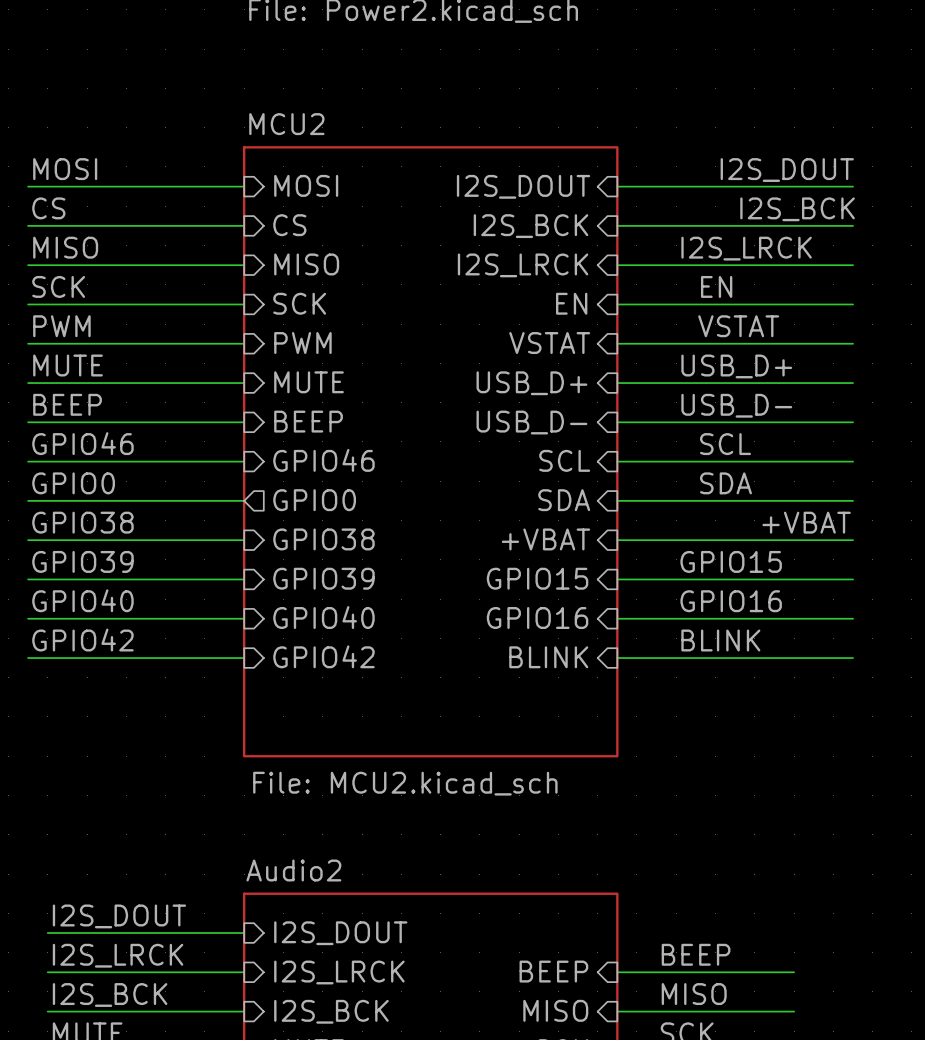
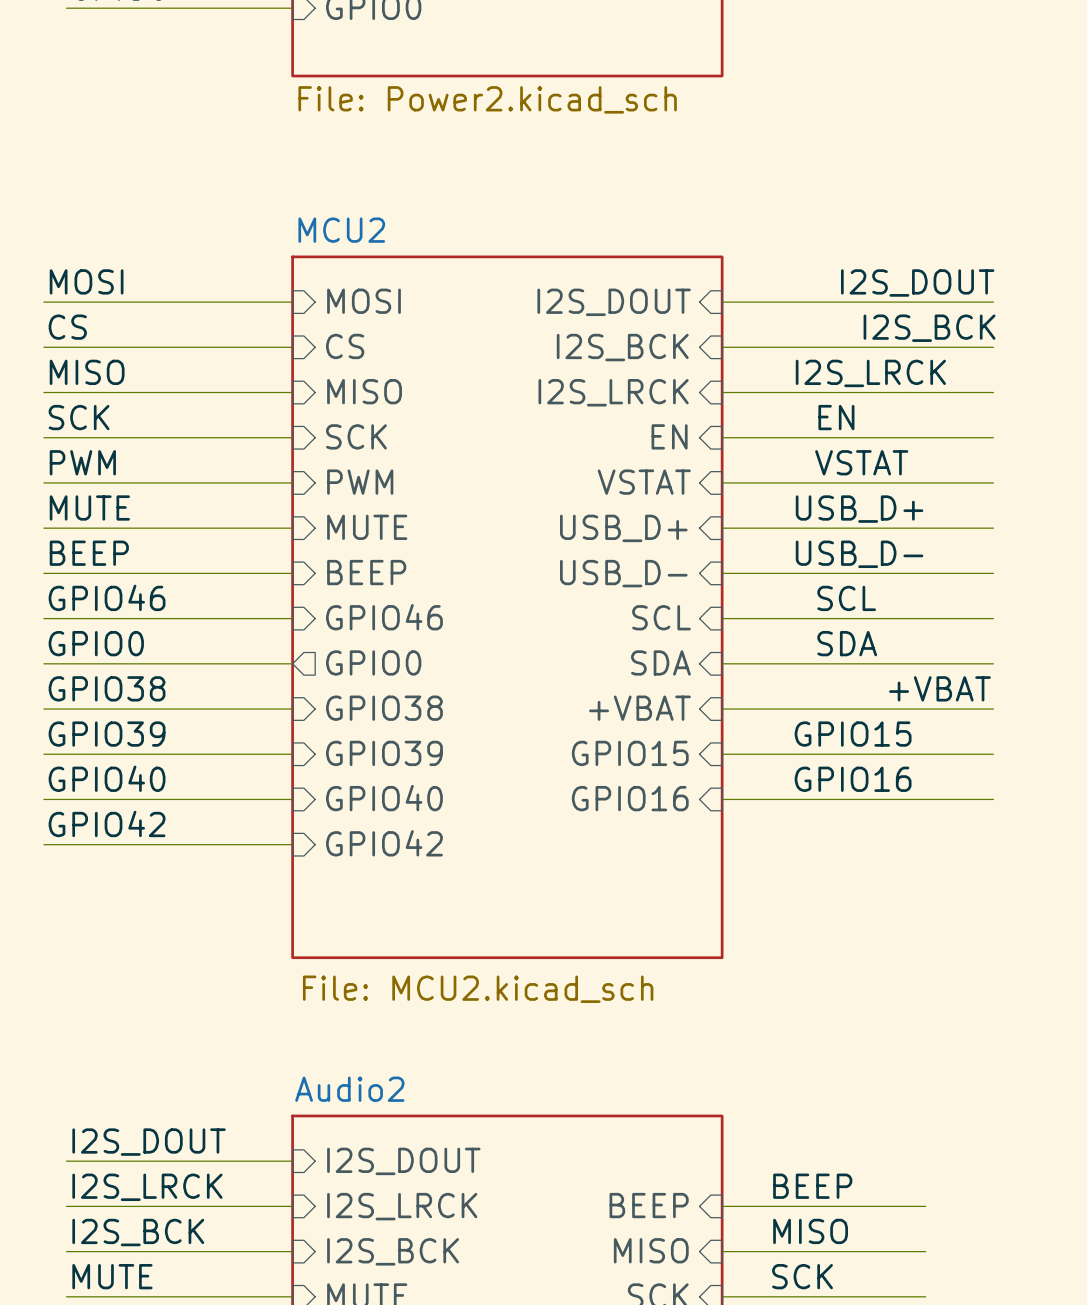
label: BLINK (720, 640) -> none
sheet pin: BLINK (548, 657) -> none
wire: (617, 658) (853, 658) -> none

